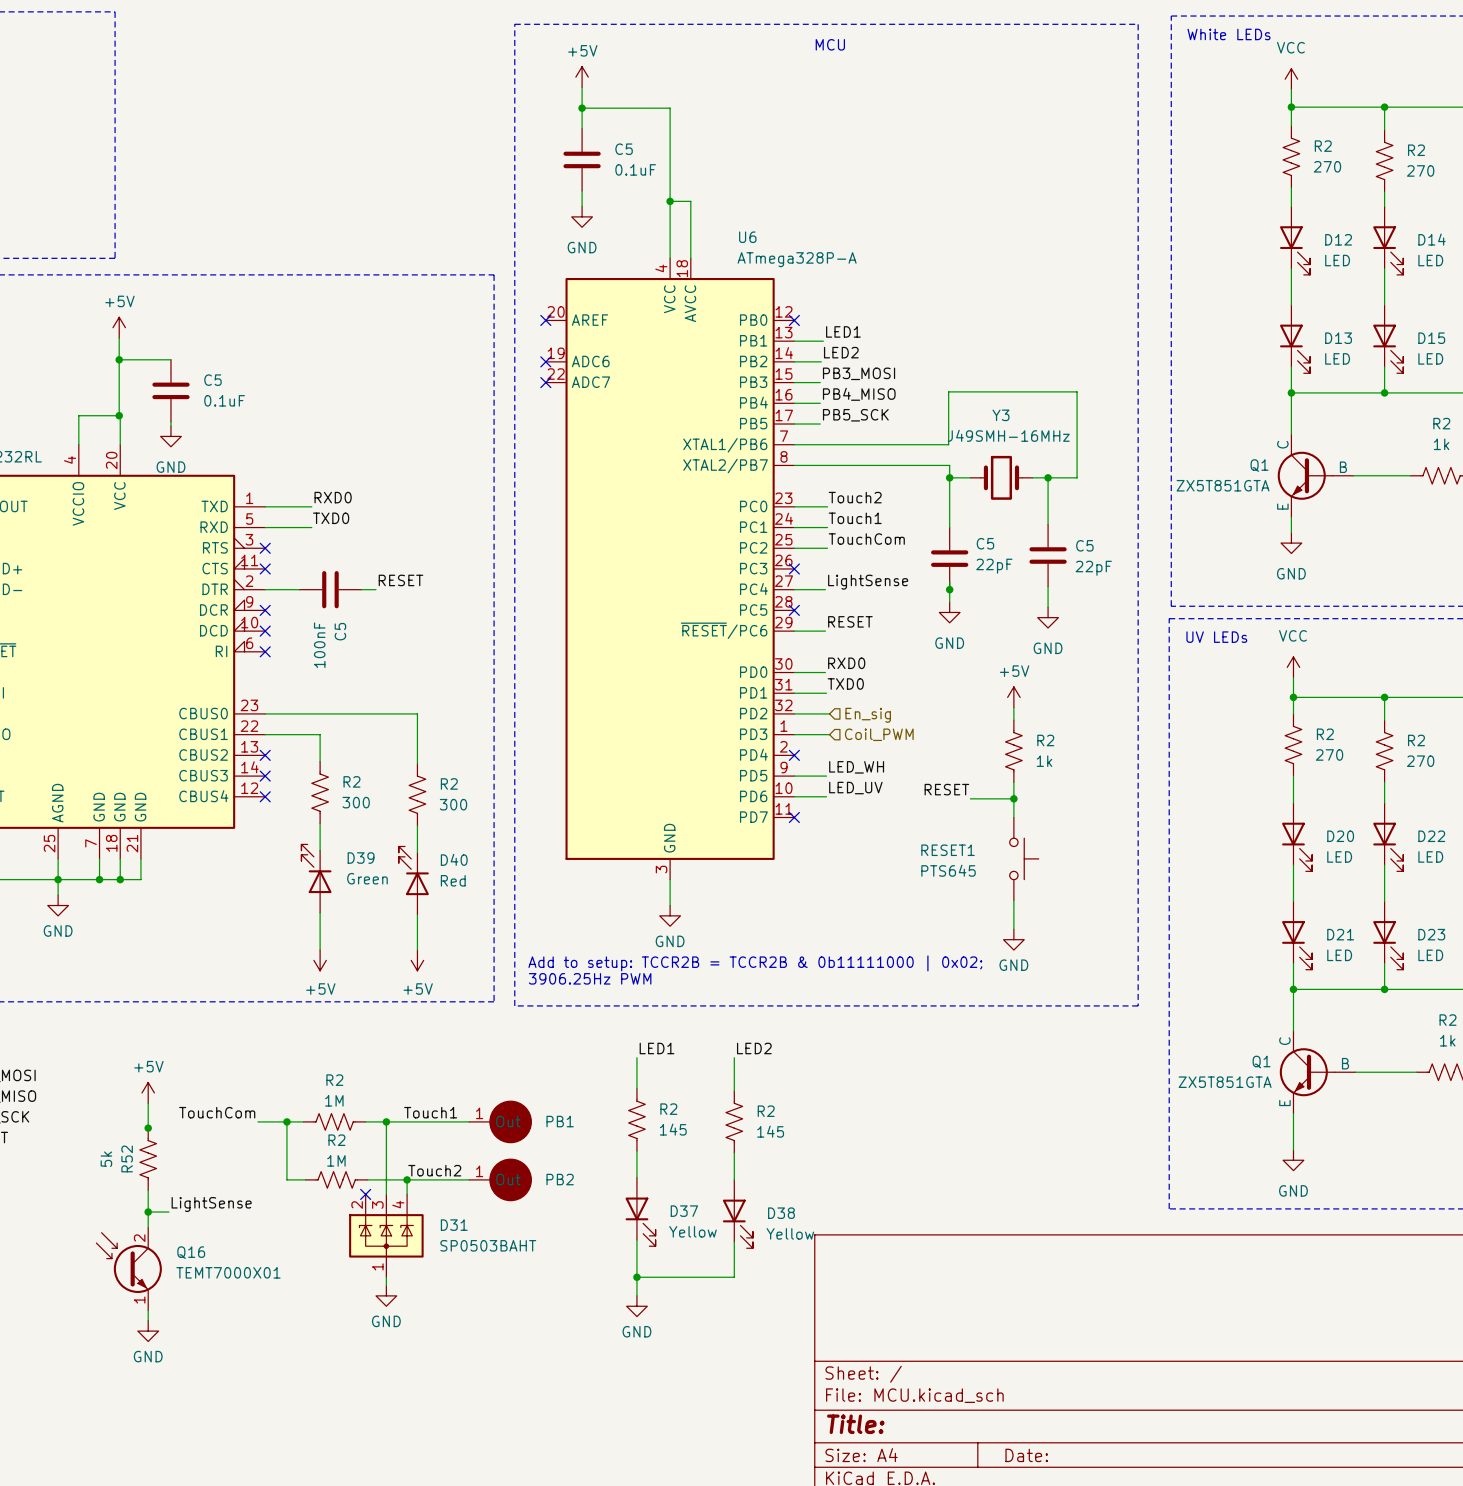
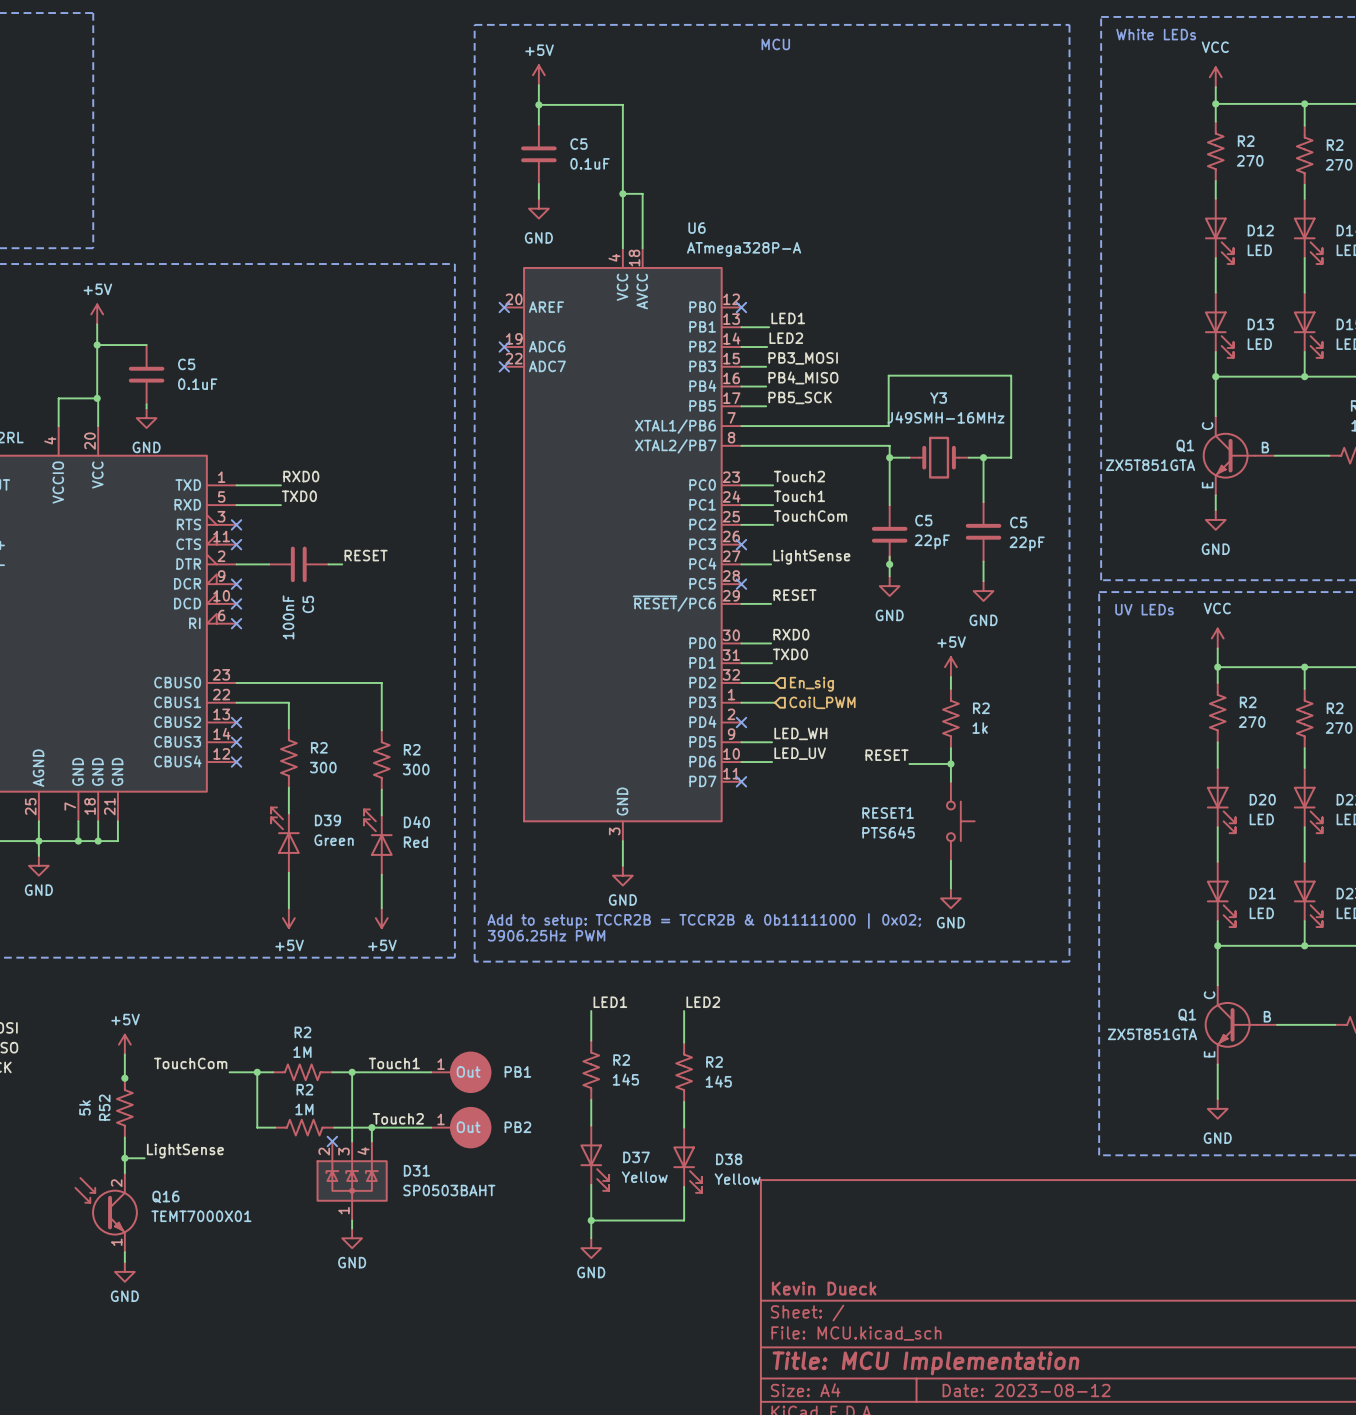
title block: none -> Kevin Dueck (824, 1288)
title block: Title: (855, 1424) -> Title: MCU Implementation (925, 1363)
title block: Date: (1026, 1455) -> Date: 2023-08-12 (1026, 1390)

